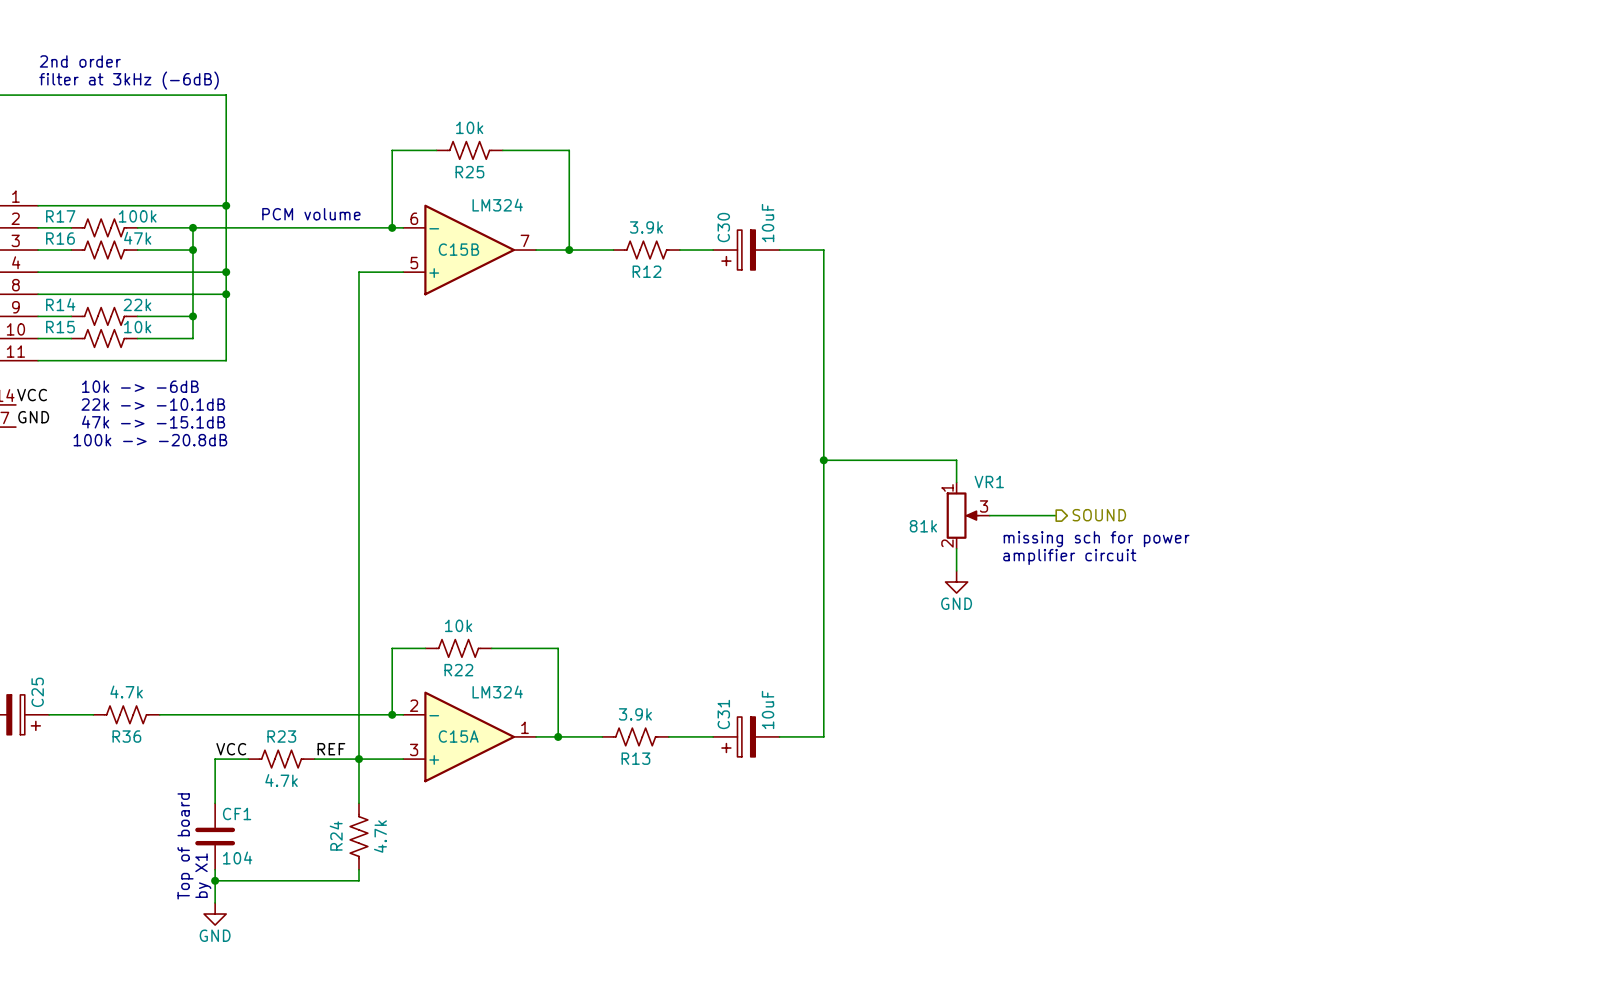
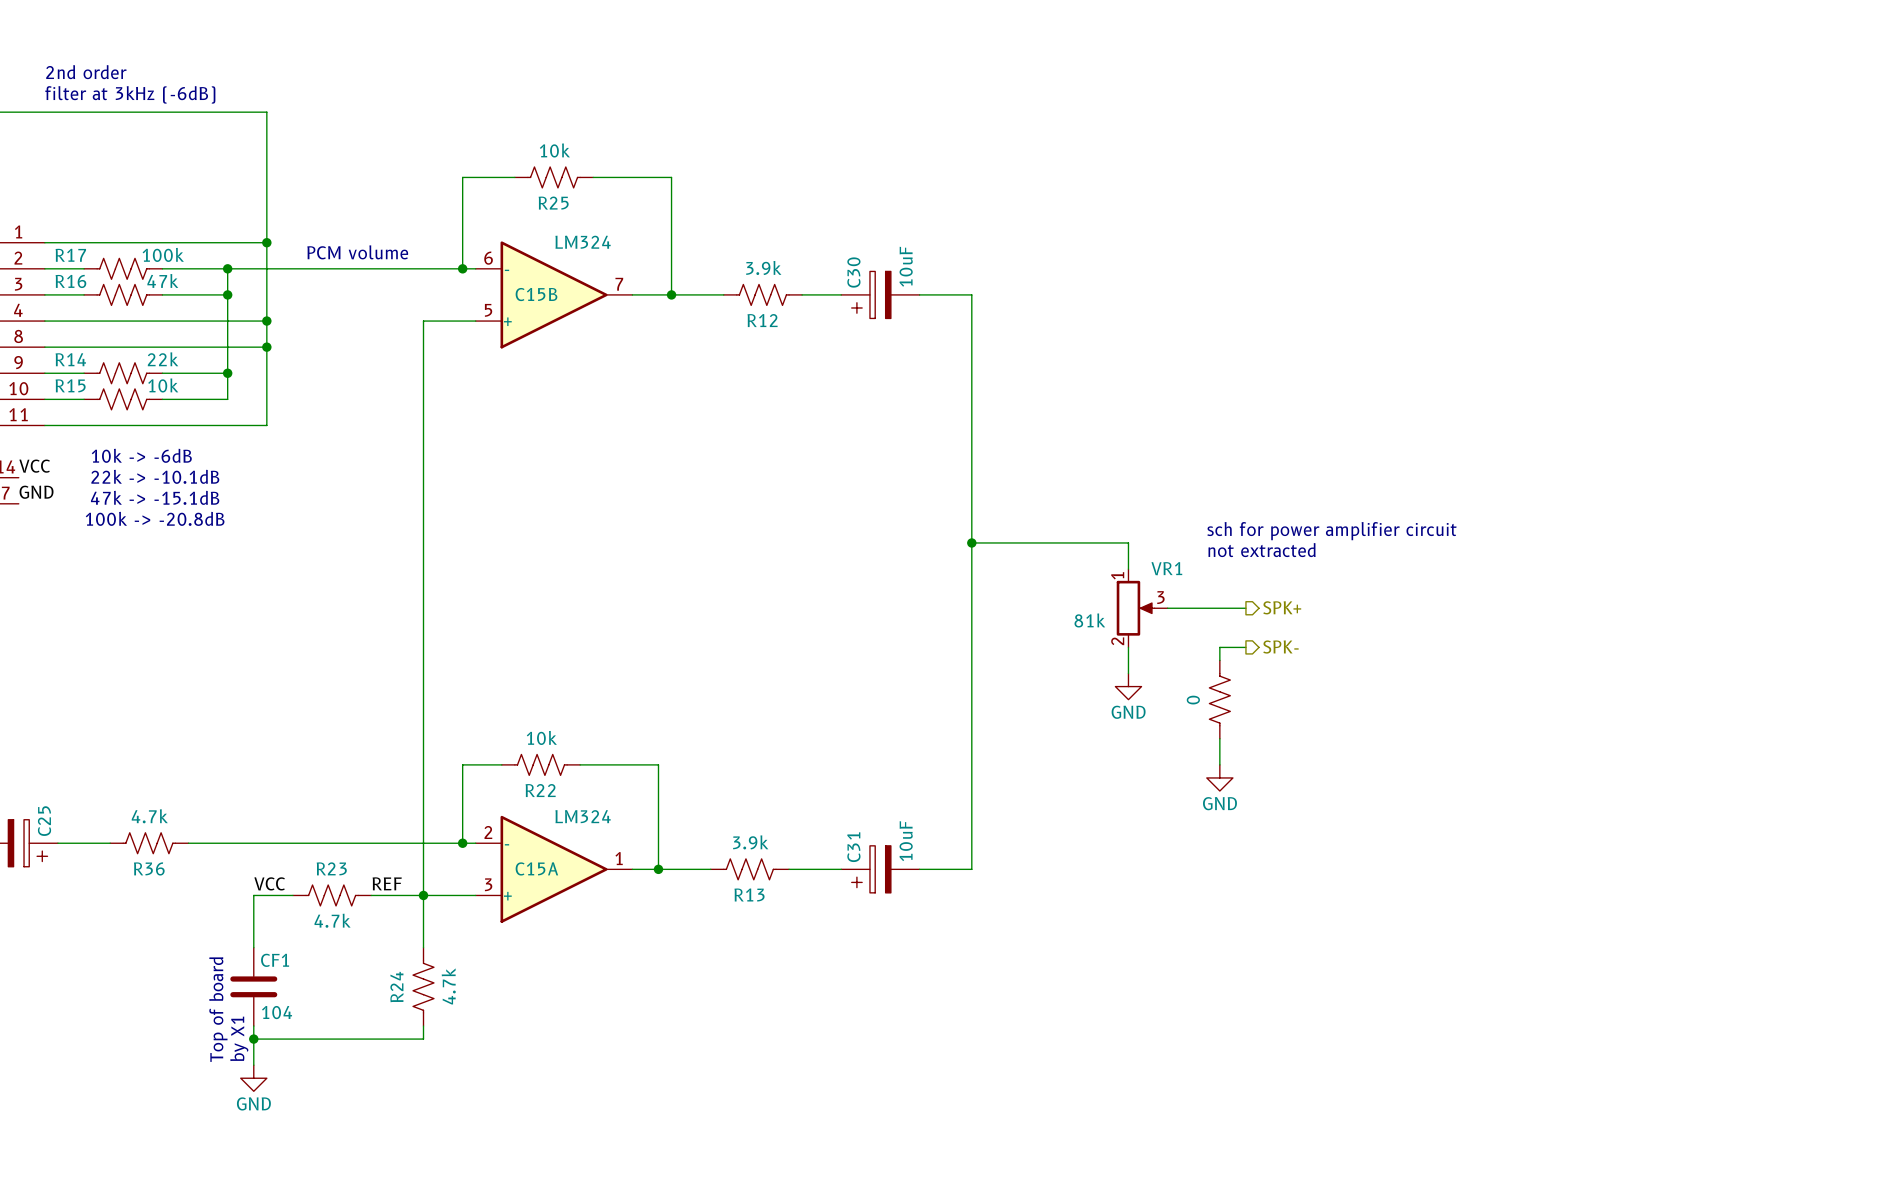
text: none -> sch for power amplifier circuit (1331, 531)
text: none -> not extracted (1262, 550)
hierarchical label: SOUND (1099, 515) -> SPK+ (1282, 607)
text: missing sch for power (1096, 539) -> none
wire: none -> (1245, 647) (1219, 647) (1219, 660)
hierarchical label: none -> SPK- (1280, 647)
text: amplifier circuit (1069, 556) -> none
part: none -> 0 (1219, 699)
wire: none -> (1219, 738) (1219, 764)
power symbol: none -> GND (1219, 777)

